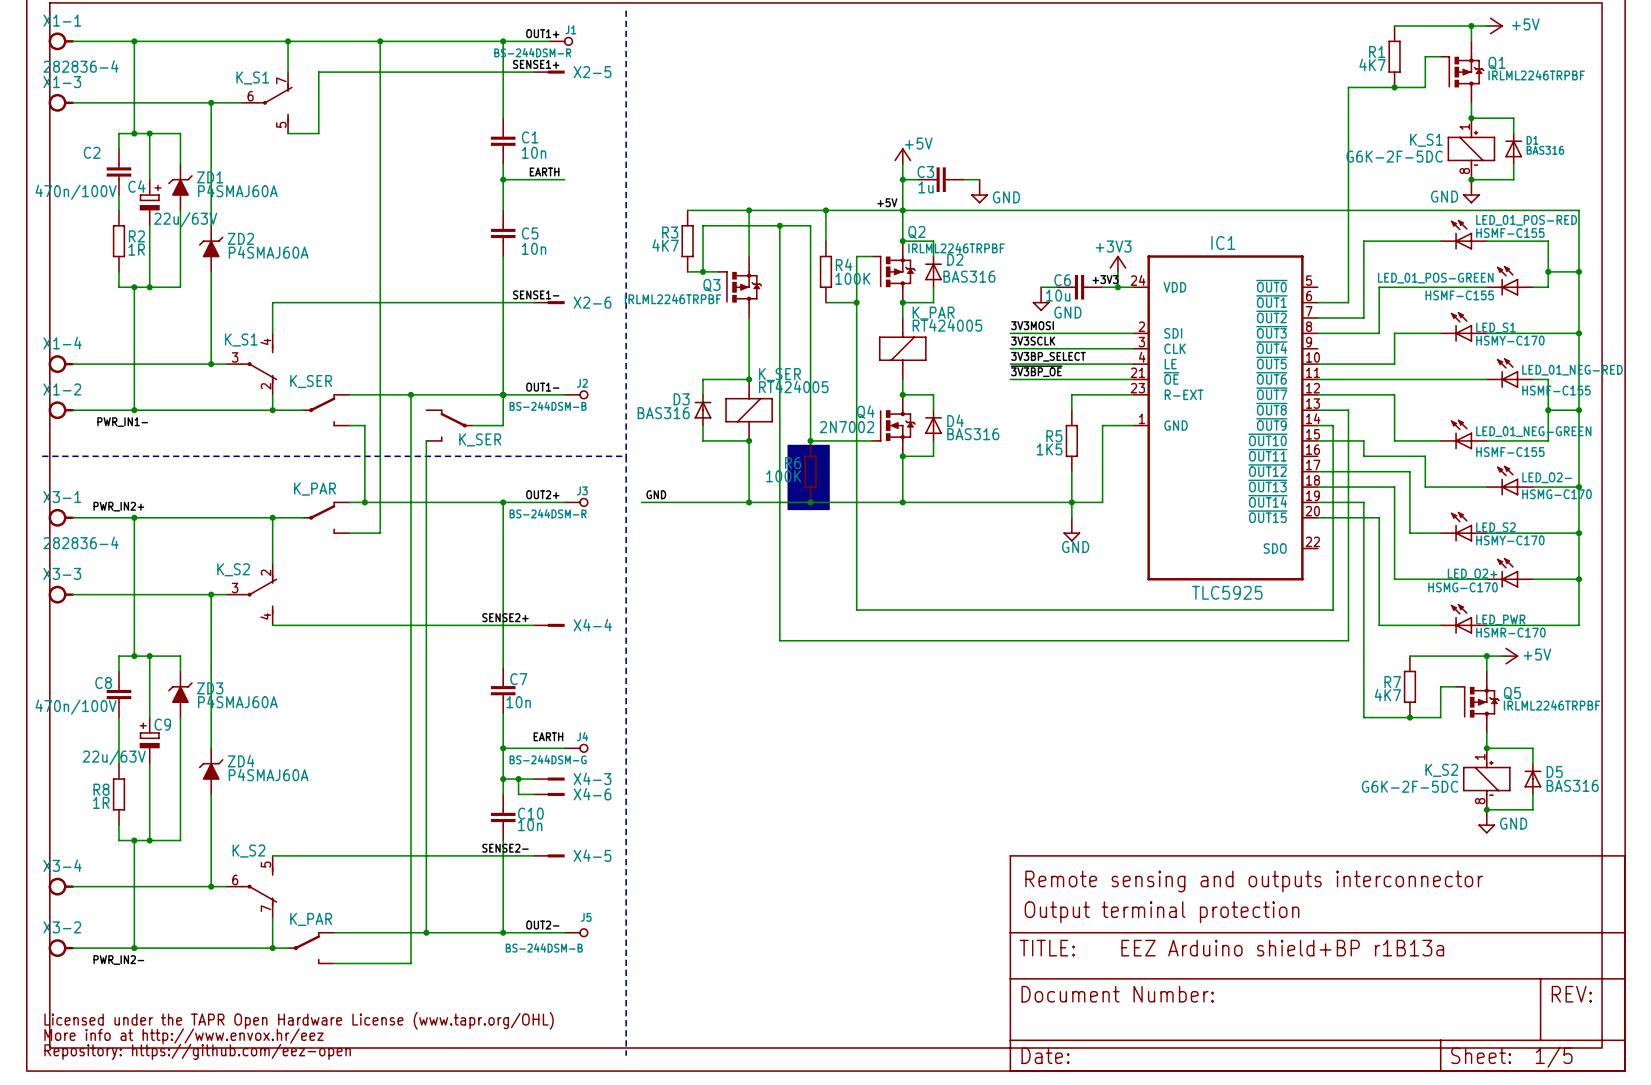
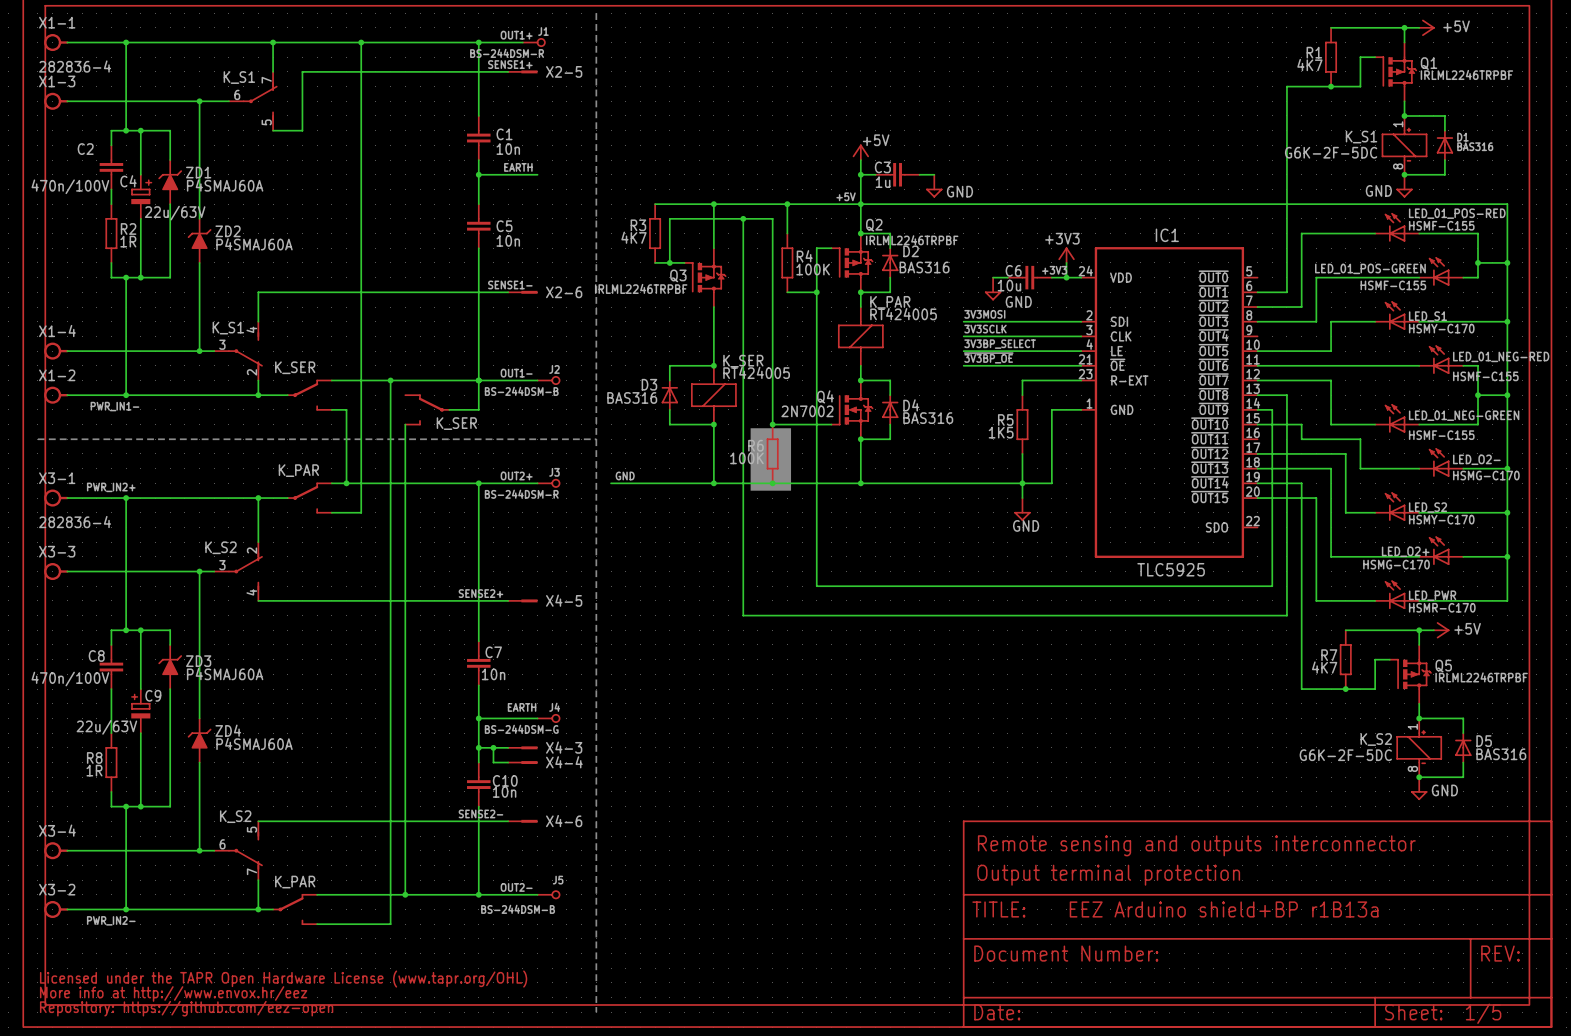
X4-4 name: X4-4 (592, 625) -> X4-5 (564, 600)
X4-6 name: X4-6 (592, 794) -> X4-4 (564, 762)
X4-5 name: X4-5 (592, 855) -> X4-6 (564, 821)

